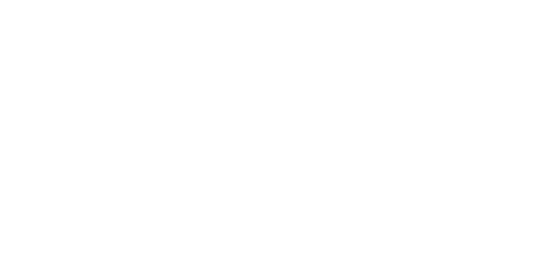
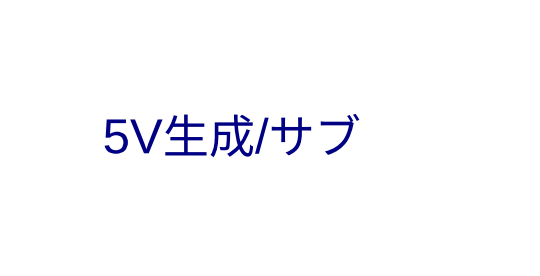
text: none -> 5V生成/サブ (231, 135)

